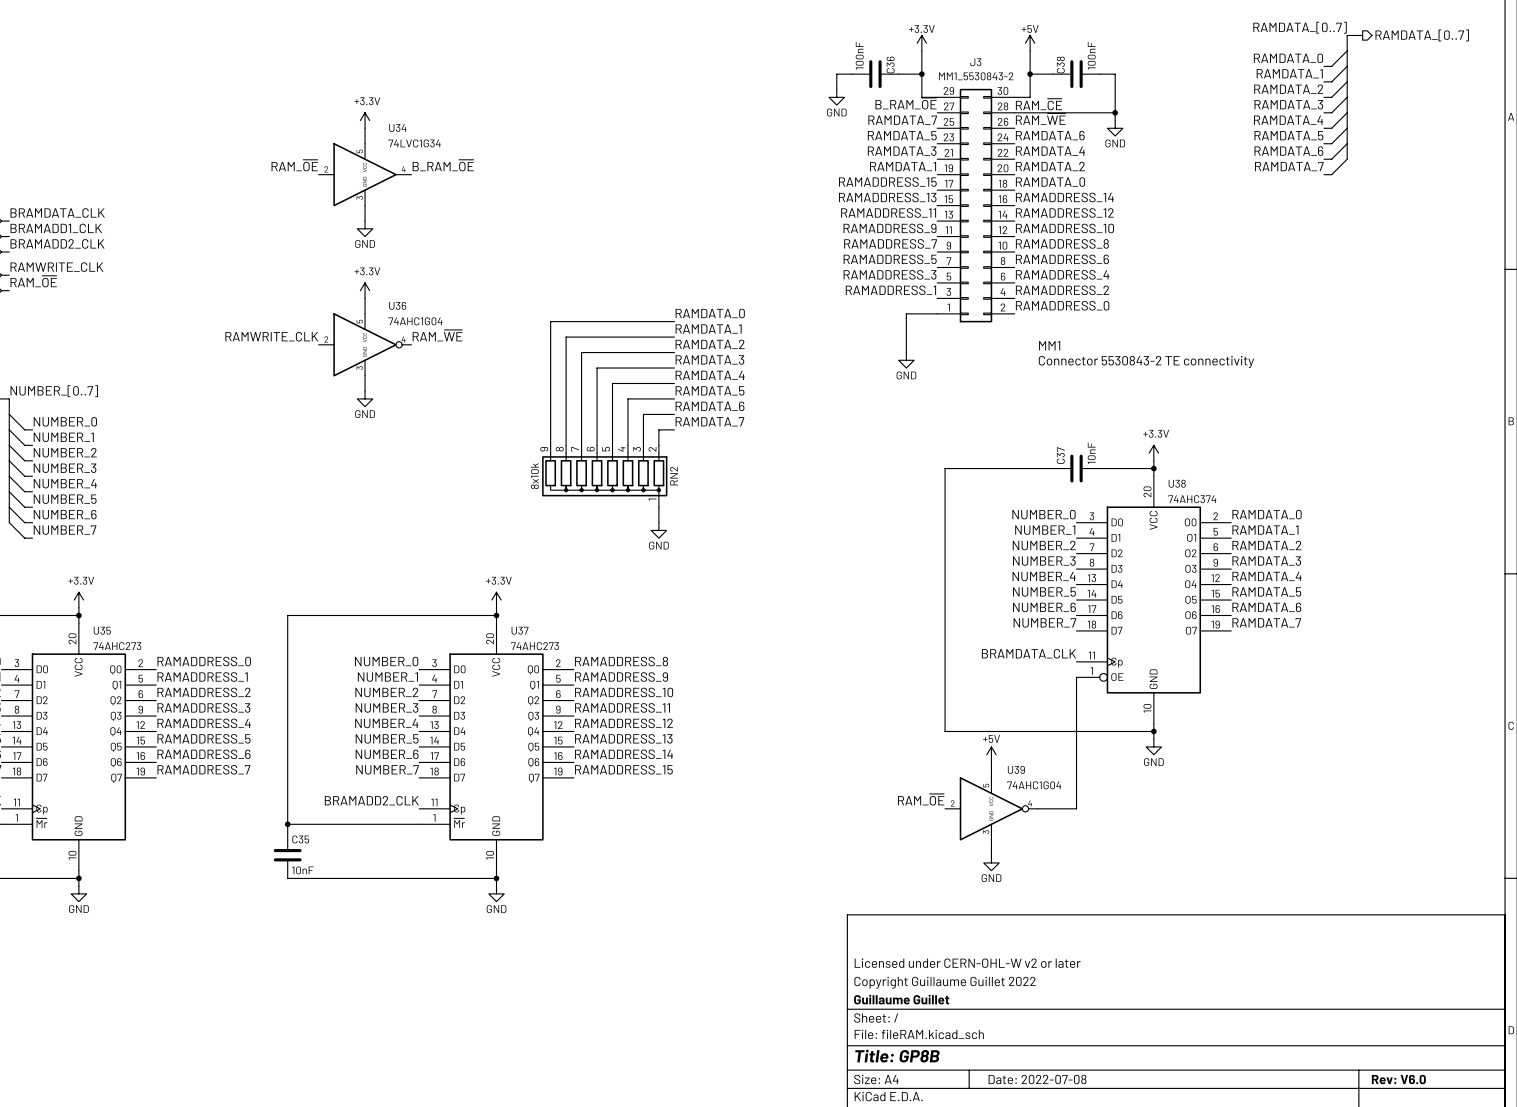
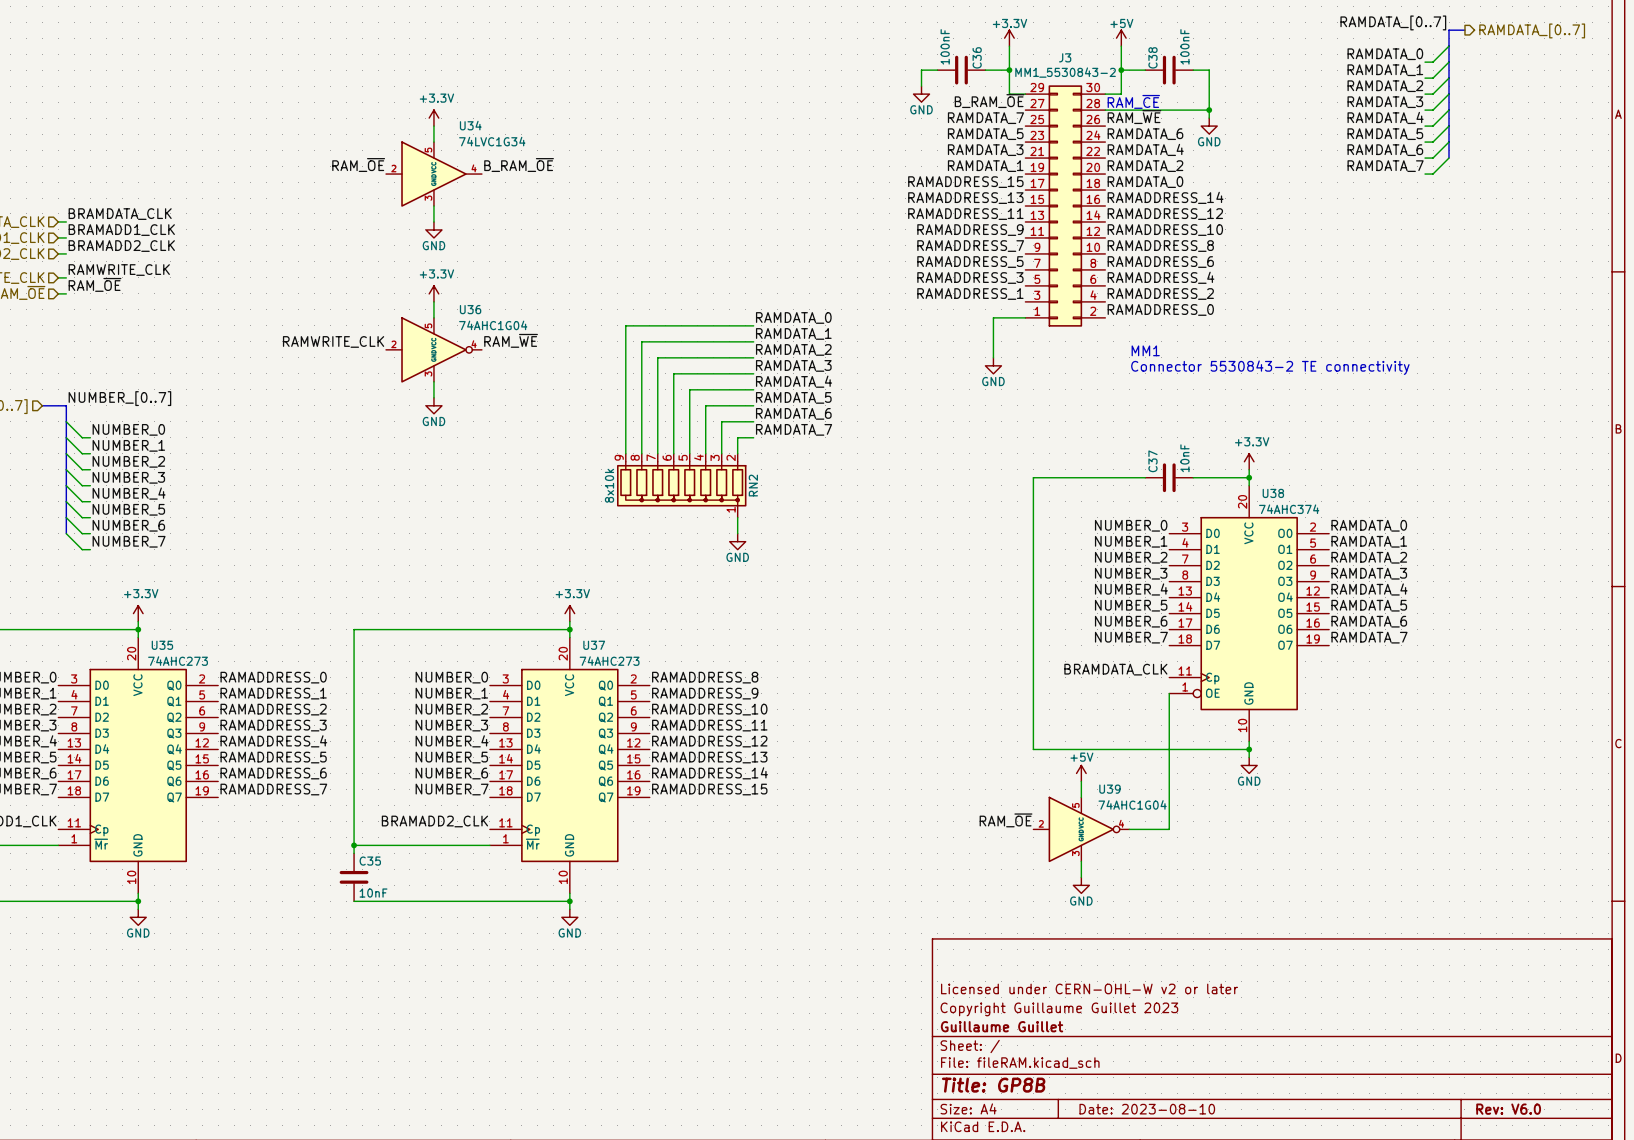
title block: Copyright Guillaume Guillet 2022 (945, 982) -> Copyright Guillaume Guillet 2023 (1059, 1009)
title block: Date: 2022-07-08 (1037, 1079) -> Date: 2023-08-10 (1147, 1109)

